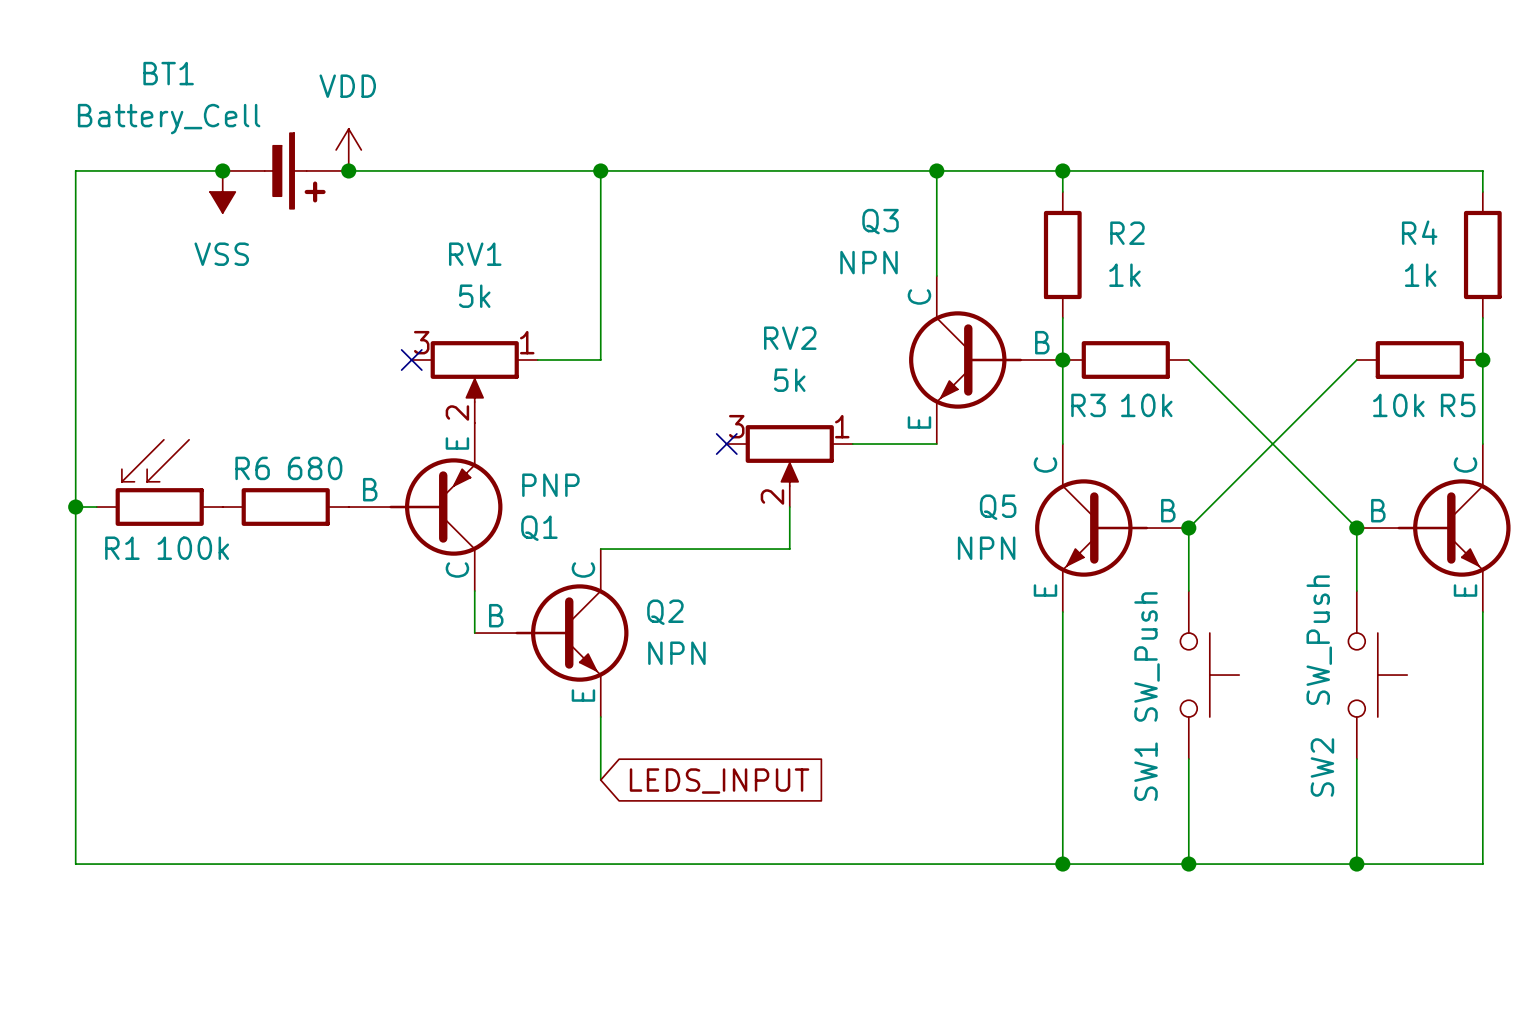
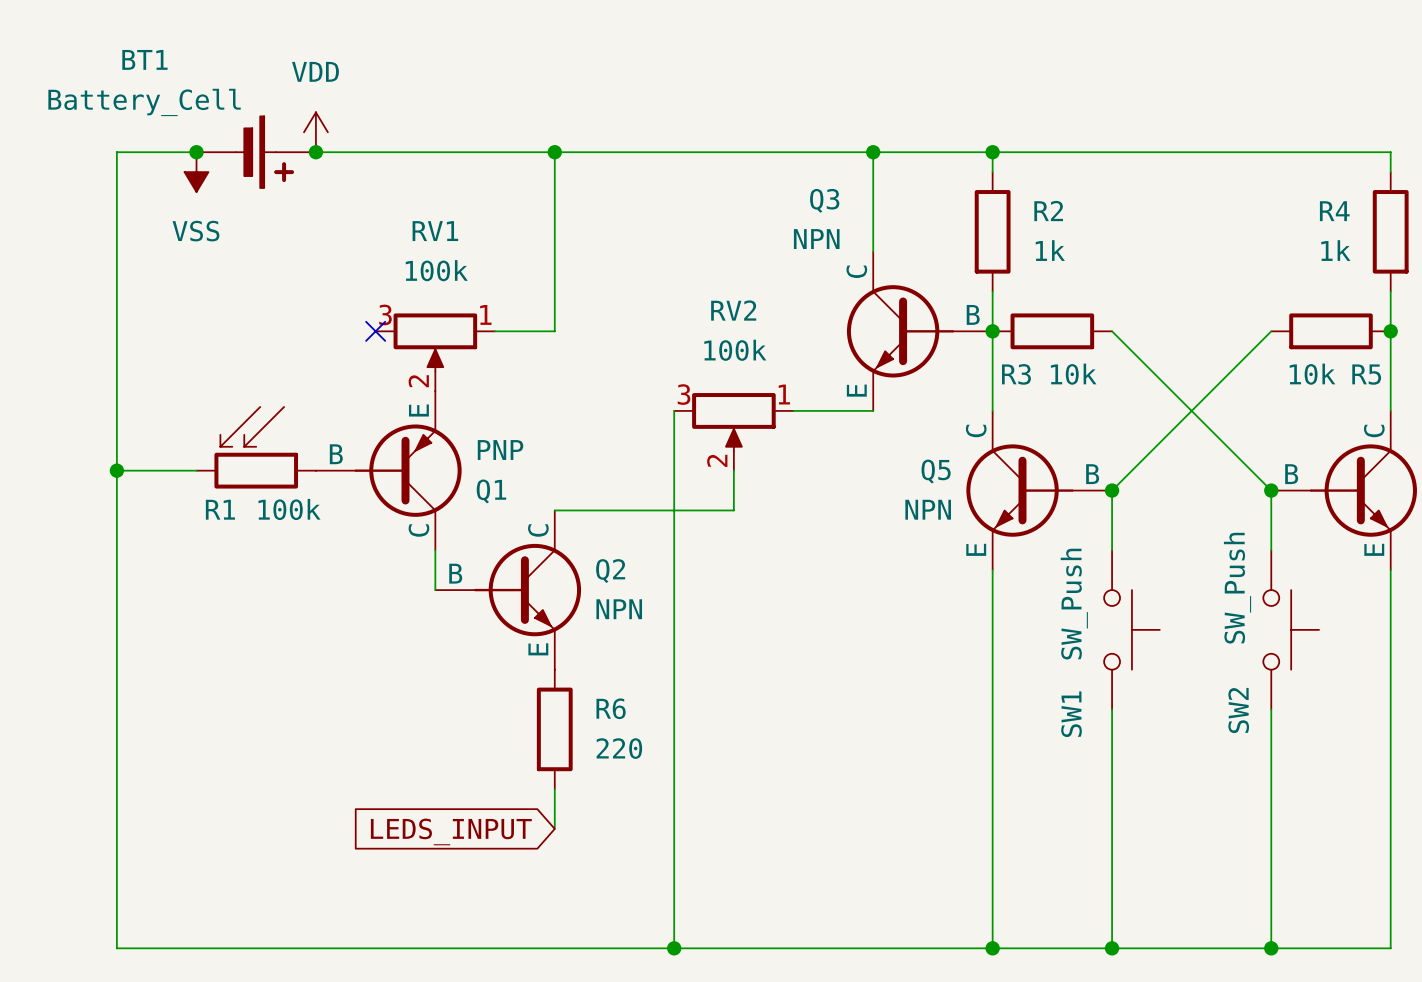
wire: (138, 170) (75, 170) (75, 864) (1482, 864) -> (116, 152) (116, 948) (1390, 948) (1390, 809)
RV1 value: 5k (474, 296) -> 100k (436, 270)
RV2 value: 5k (789, 380) -> 100k (735, 350)
wire: none -> (674, 410) (674, 948)
no-connect mark: (726, 444) -> none
R6 name position: R6 (252, 468) -> R6 (611, 708)
R6 value: 680 (315, 468) -> 220 (619, 748)
R1 position: (159, 482) -> (256, 447)
wire: (75, 507) (96, 507) -> none
junction position: (75, 507) -> (116, 470)
wire: none -> (116, 470) (196, 470)
R6 rotation: 0° (285, 507) -> 90° clockwise (554, 729)
R6 position: (285, 507) -> (554, 729)
wire: (600, 717) (600, 780) -> none
global label rotation: 0° (719, 781) -> 180° (451, 831)
global label position: LEDS_INPUT (719, 781) -> LEDS_INPUT (451, 831)
wire: none -> (554, 789) (554, 828)
wire: none -> (992, 809) (992, 948)
junction: (1062, 864) -> none
wire: none -> (1112, 809) (1112, 948)
junction: (1188, 864) -> none
wire: none -> (1271, 809) (1271, 948)
junction: (1356, 864) -> none
junction: none -> (674, 948)
junction: none -> (992, 948)
junction: none -> (1112, 948)
junction: none -> (1271, 948)

